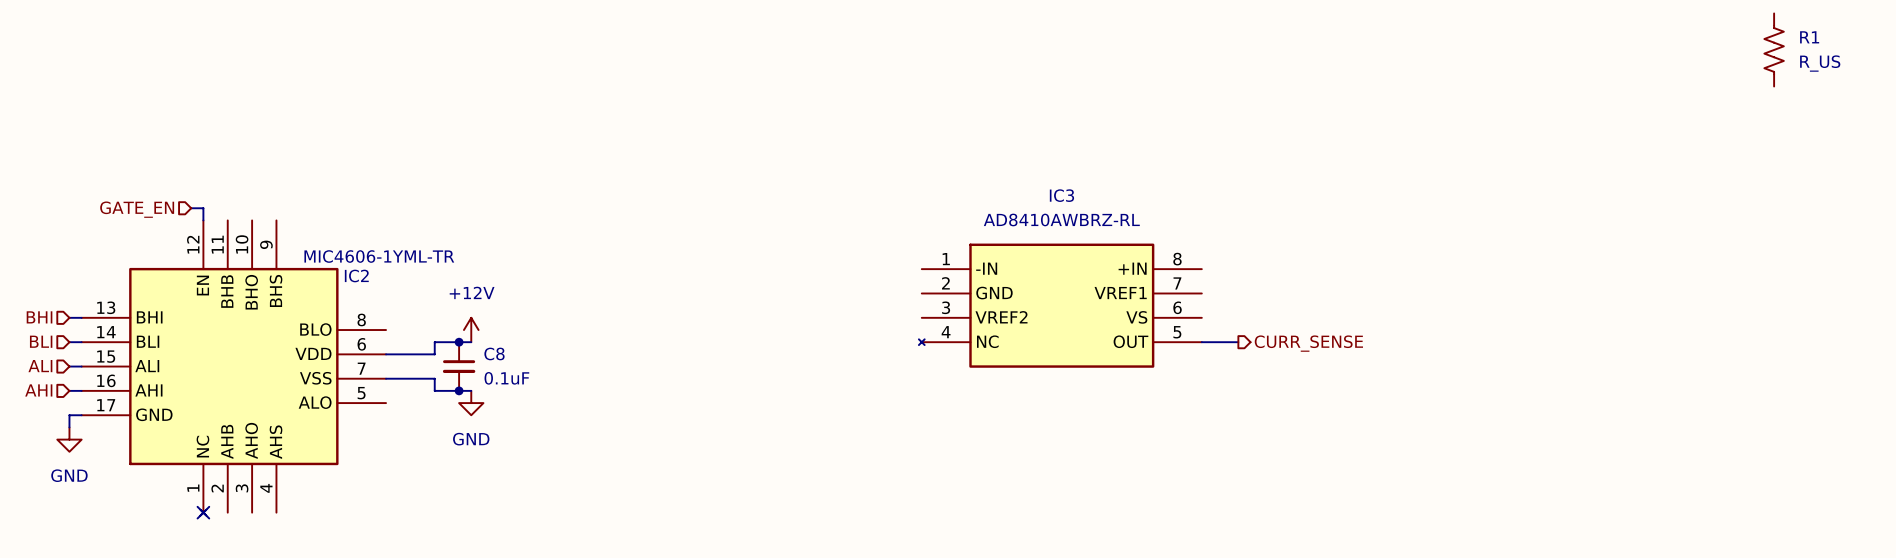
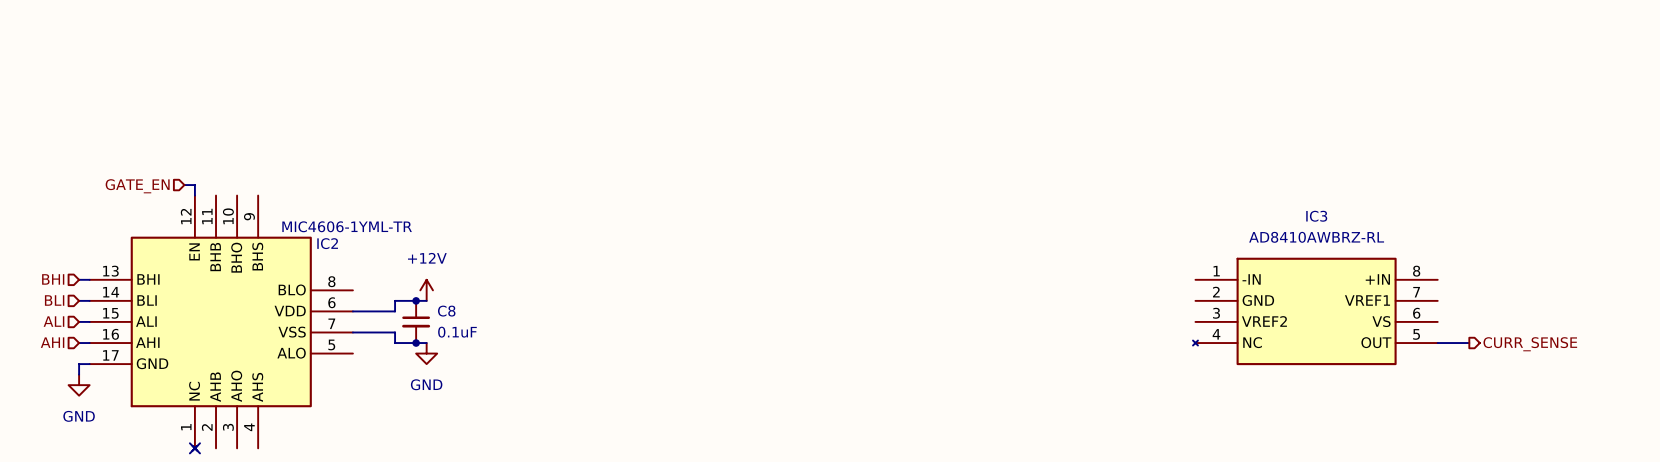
R1: R_US (1774, 49) -> none
IC3 position: (1060, 305) -> (1315, 311)
wire: (1201, 342) (1238, 342) -> none
hierarchical label: CURR_SENSE (1308, 343) -> none
wire: none -> (1437, 343) (1469, 343)
hierarchical label: none -> CURR_SENSE (1530, 344)

